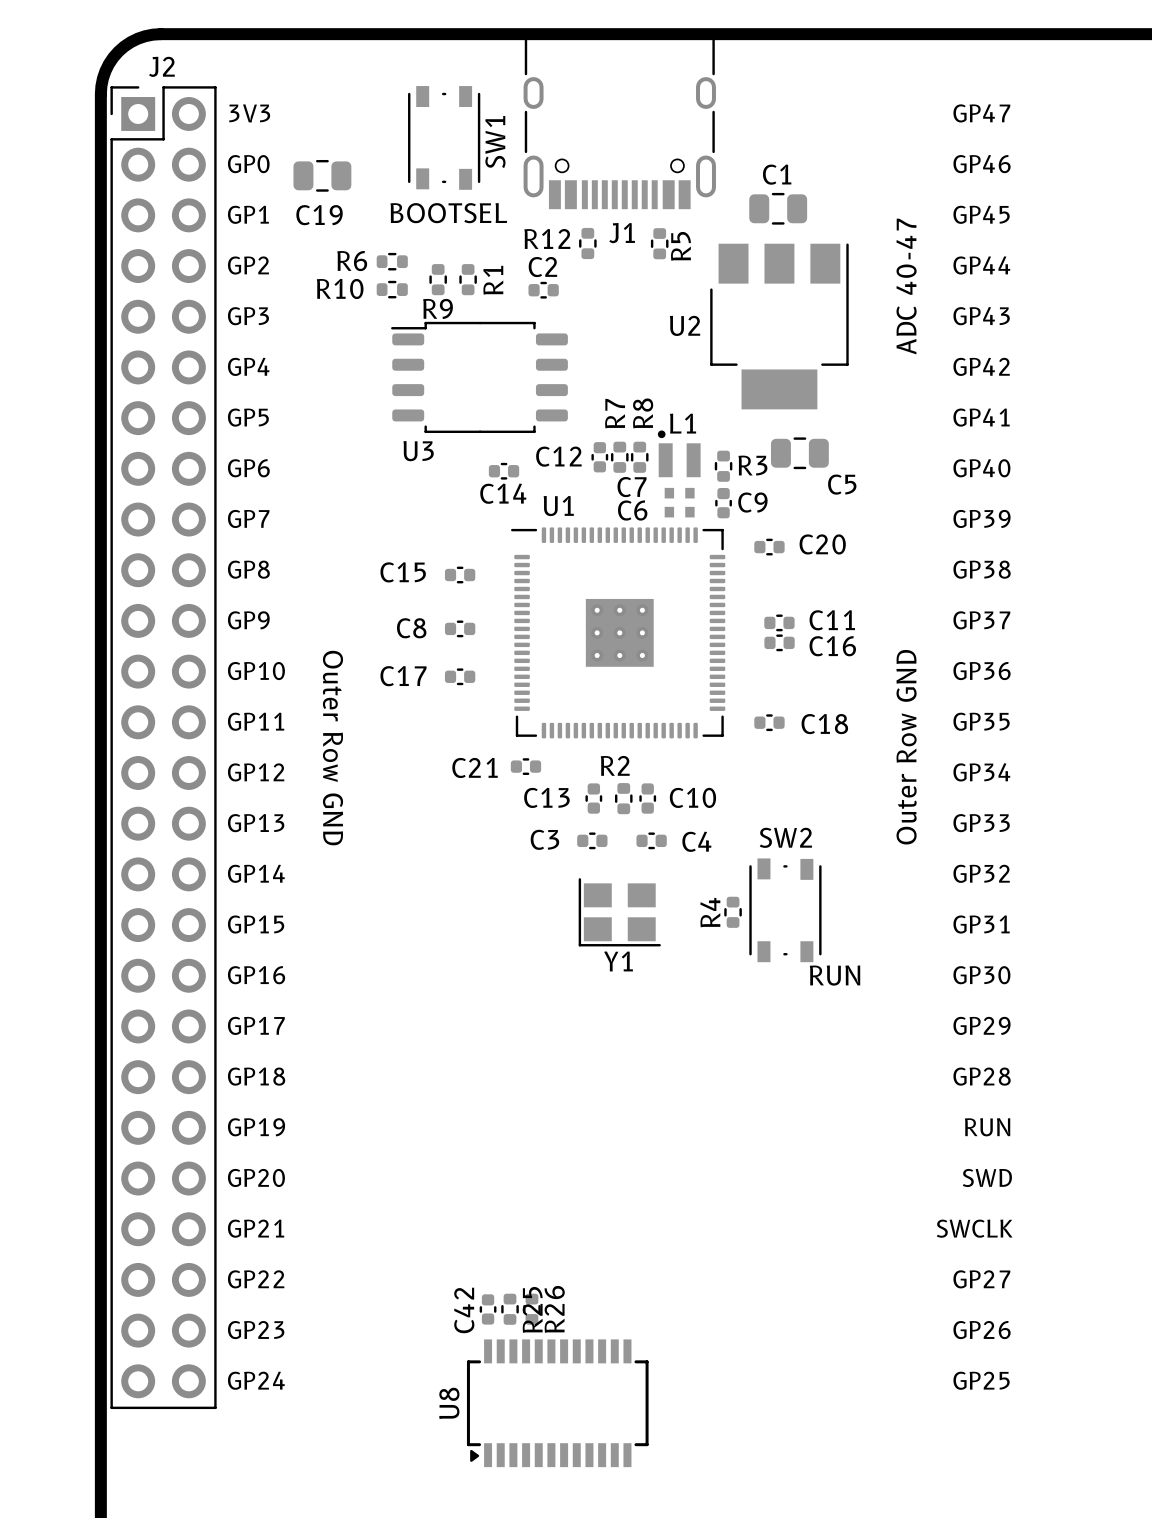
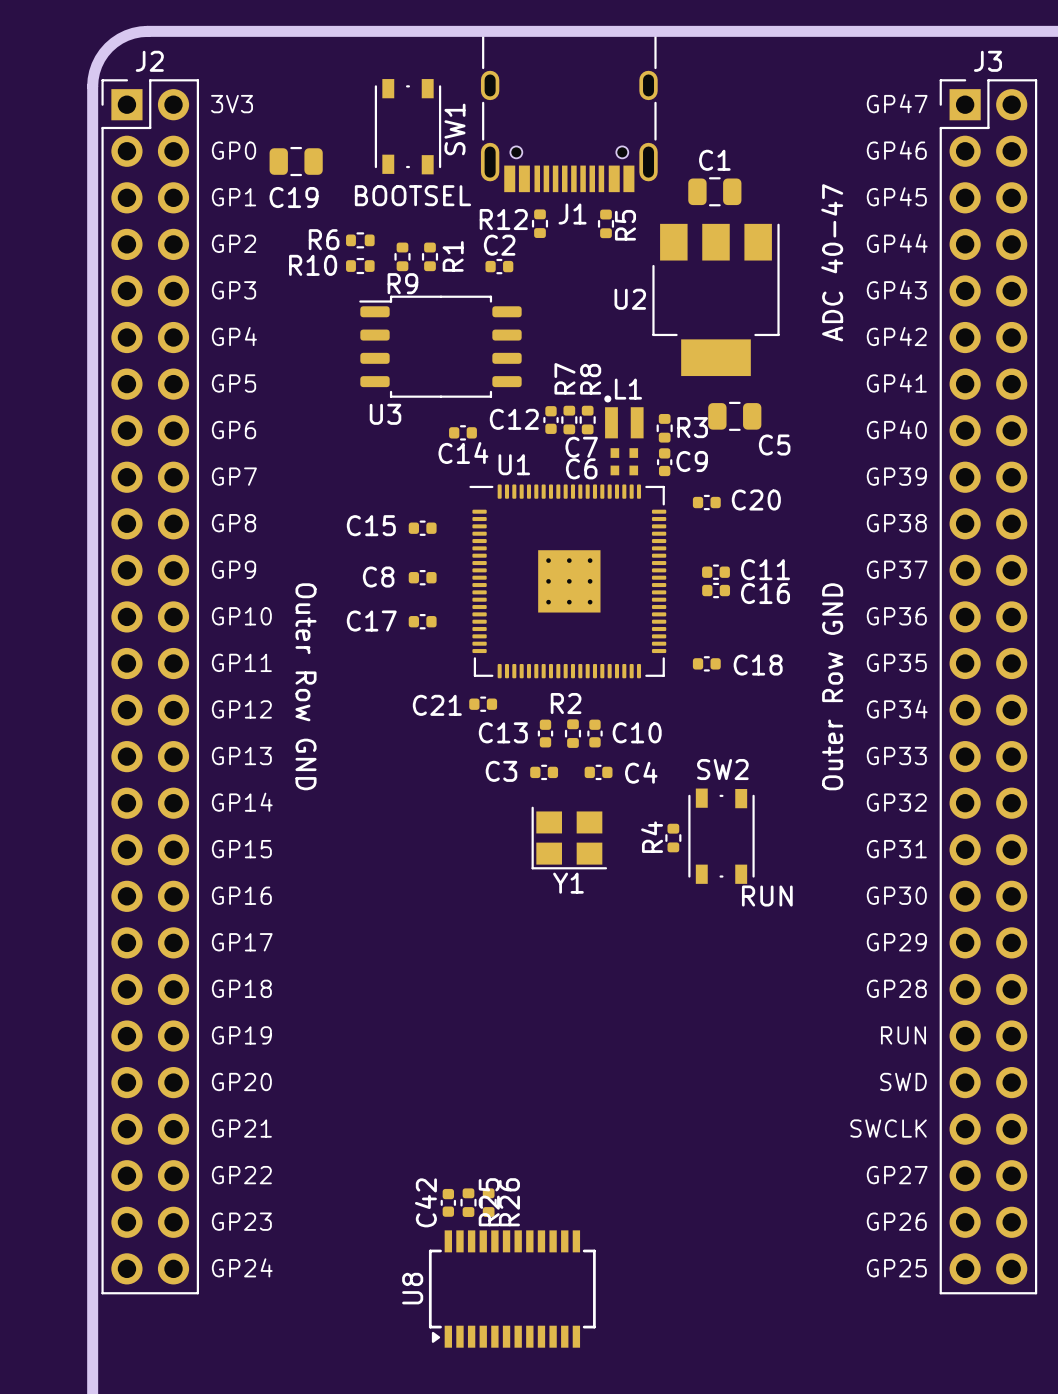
J3: none -> (988, 686)

